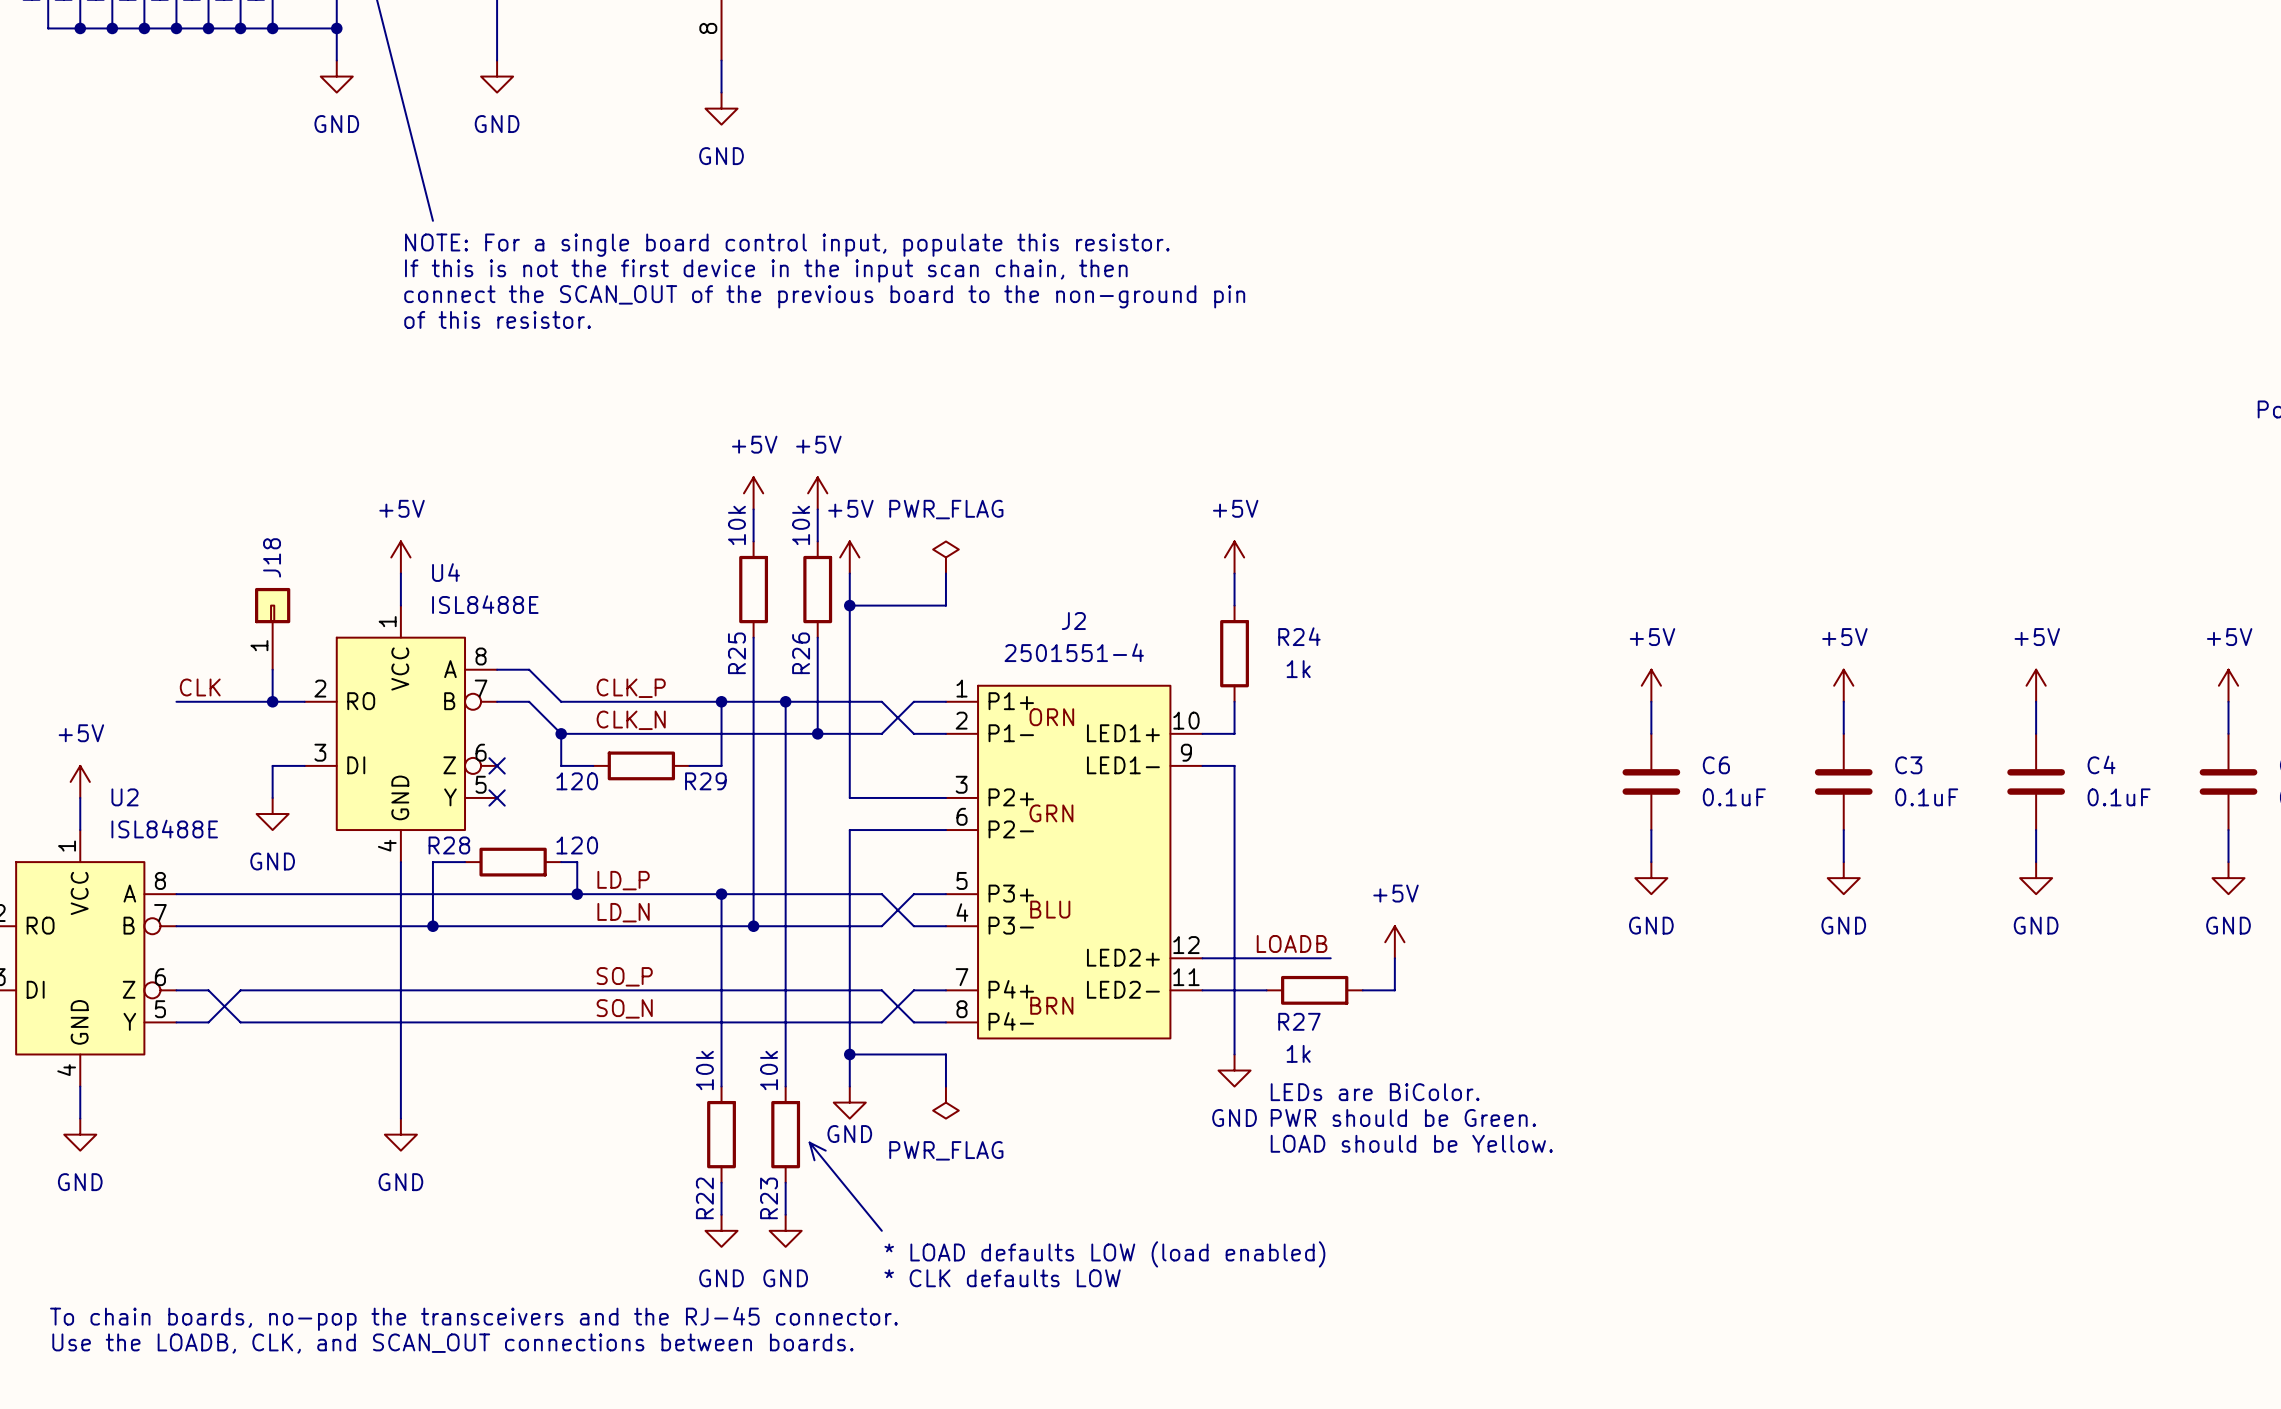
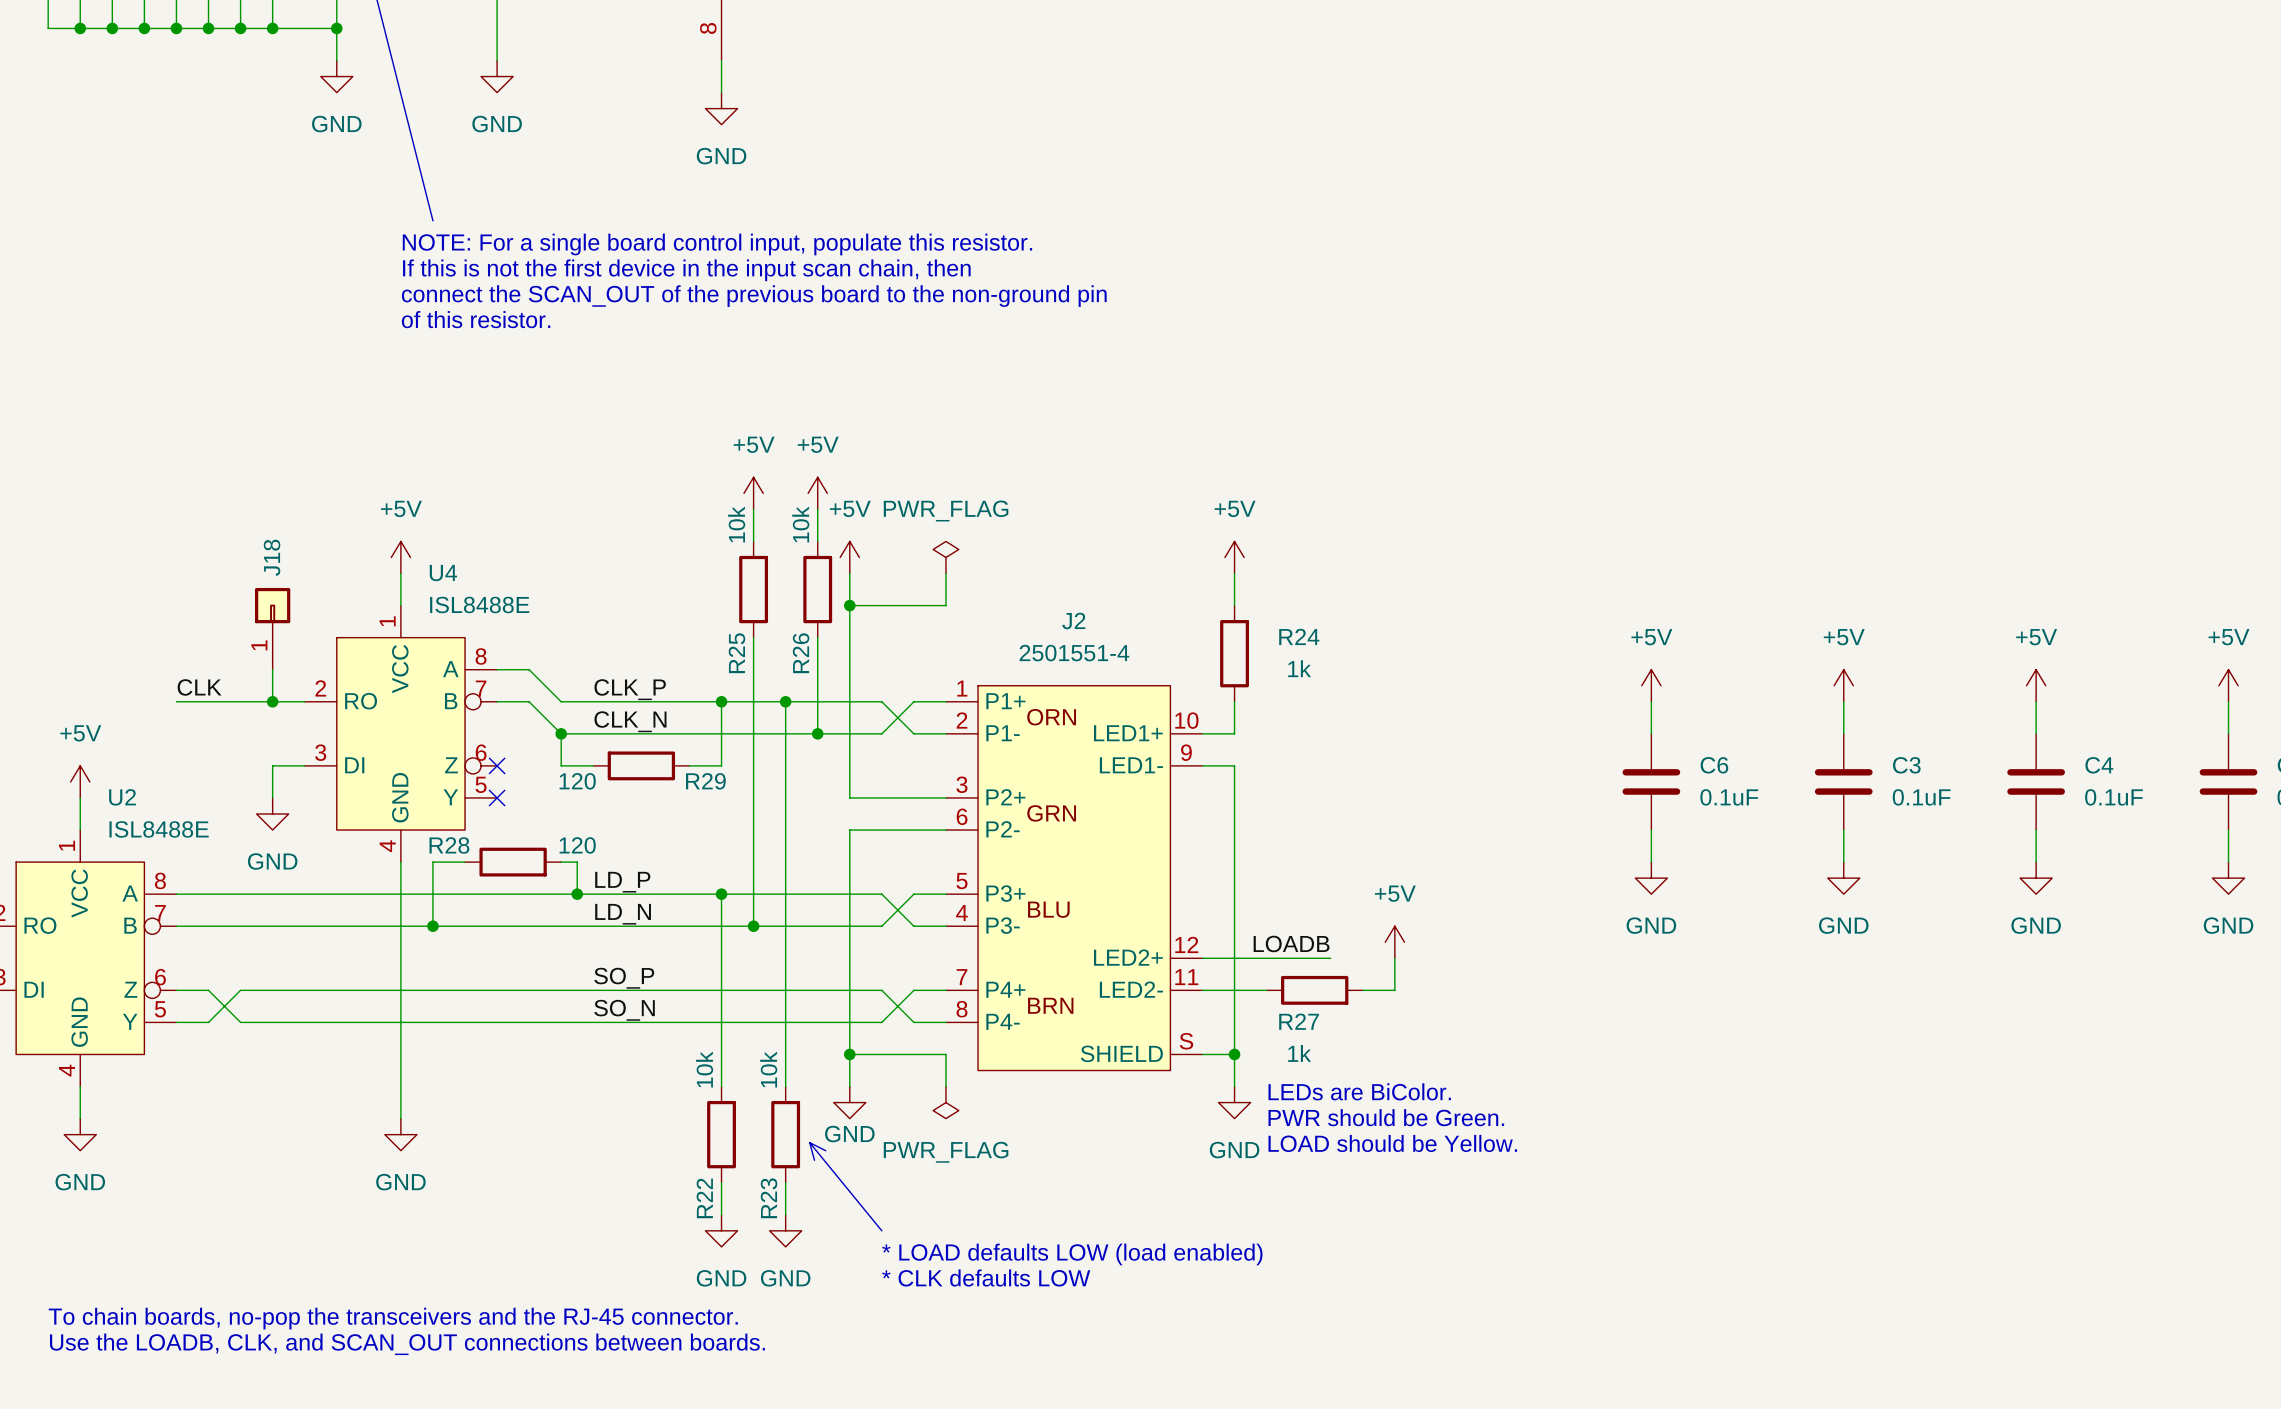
J2 symbol: [945, 685, 1203, 1039] -> [945, 685, 1203, 1071]
wire: none -> (1202, 1054) (1234, 1054) (1234, 1086)
junction: none -> (1234, 1054)
power symbol position: GND (1234, 1070) -> GND (1234, 1102)

